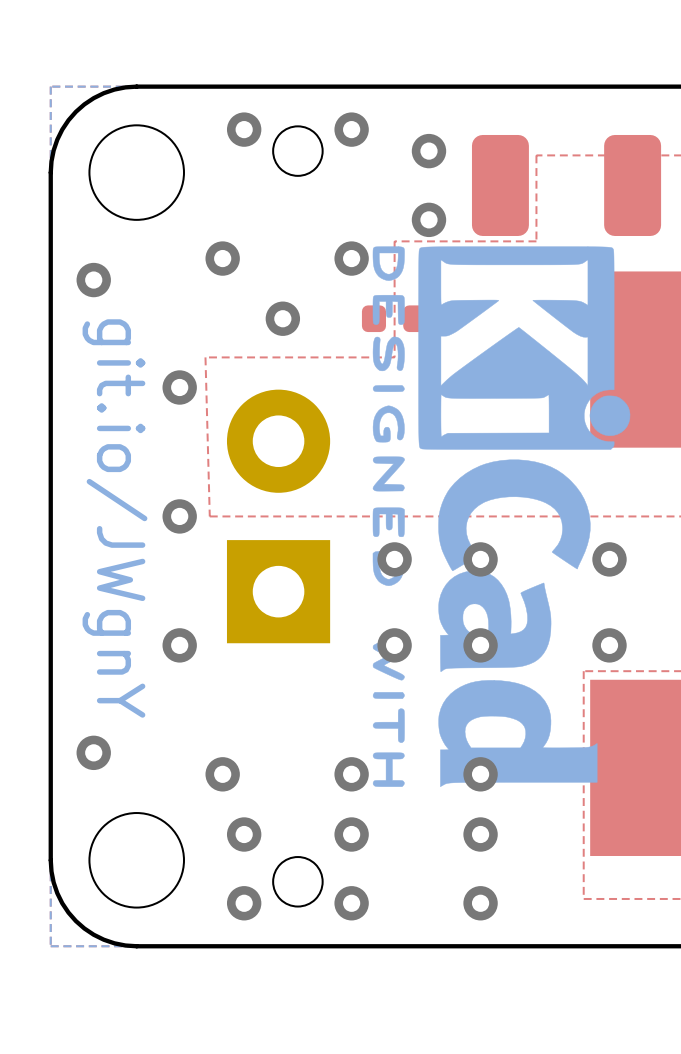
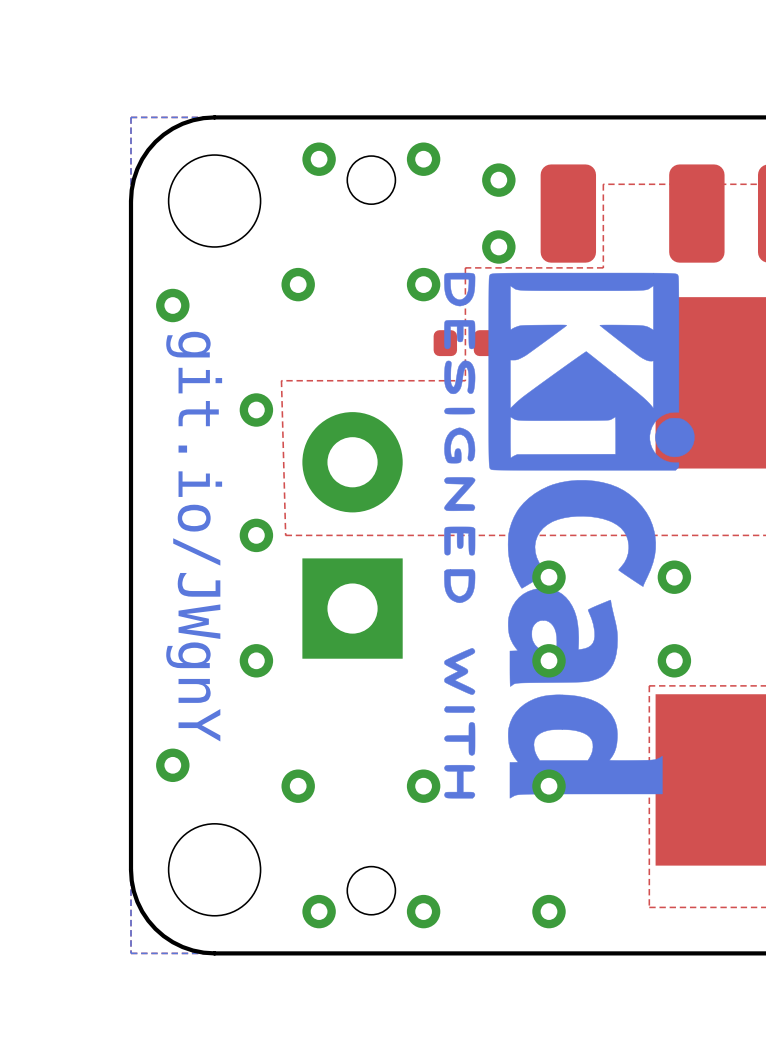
via: (282, 318) -> none
via: (394, 559) -> none
via: (394, 645) -> none
via: (244, 834) -> none
via: (351, 834) -> none
via: (480, 834) -> none

